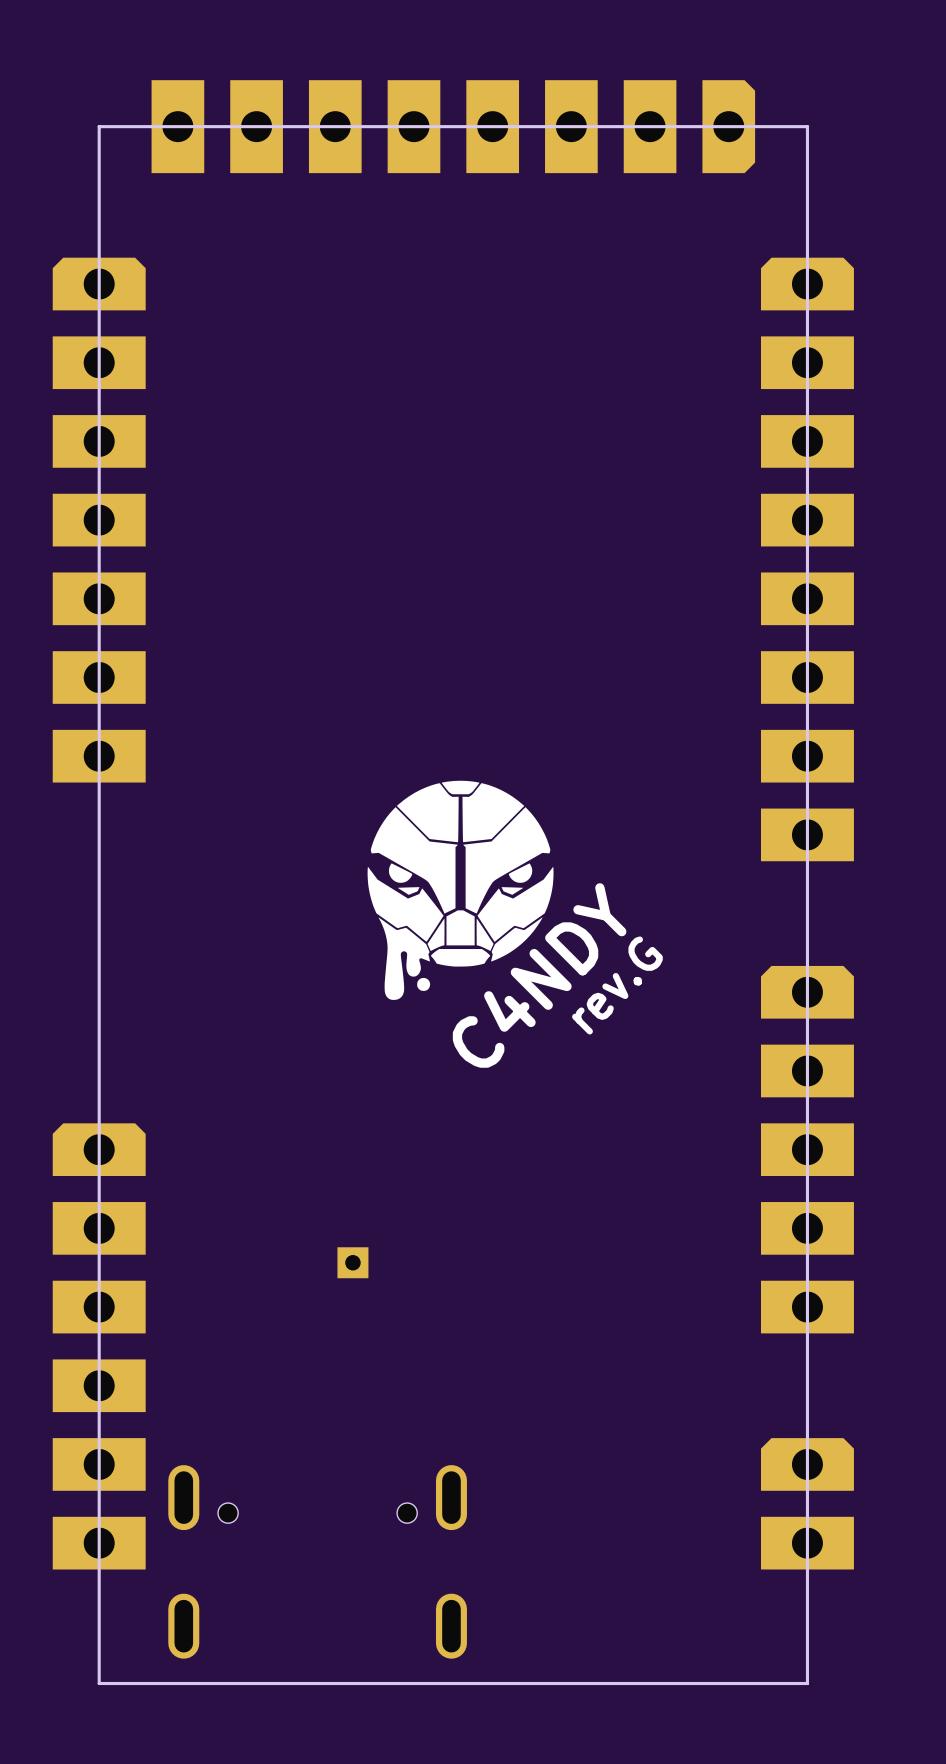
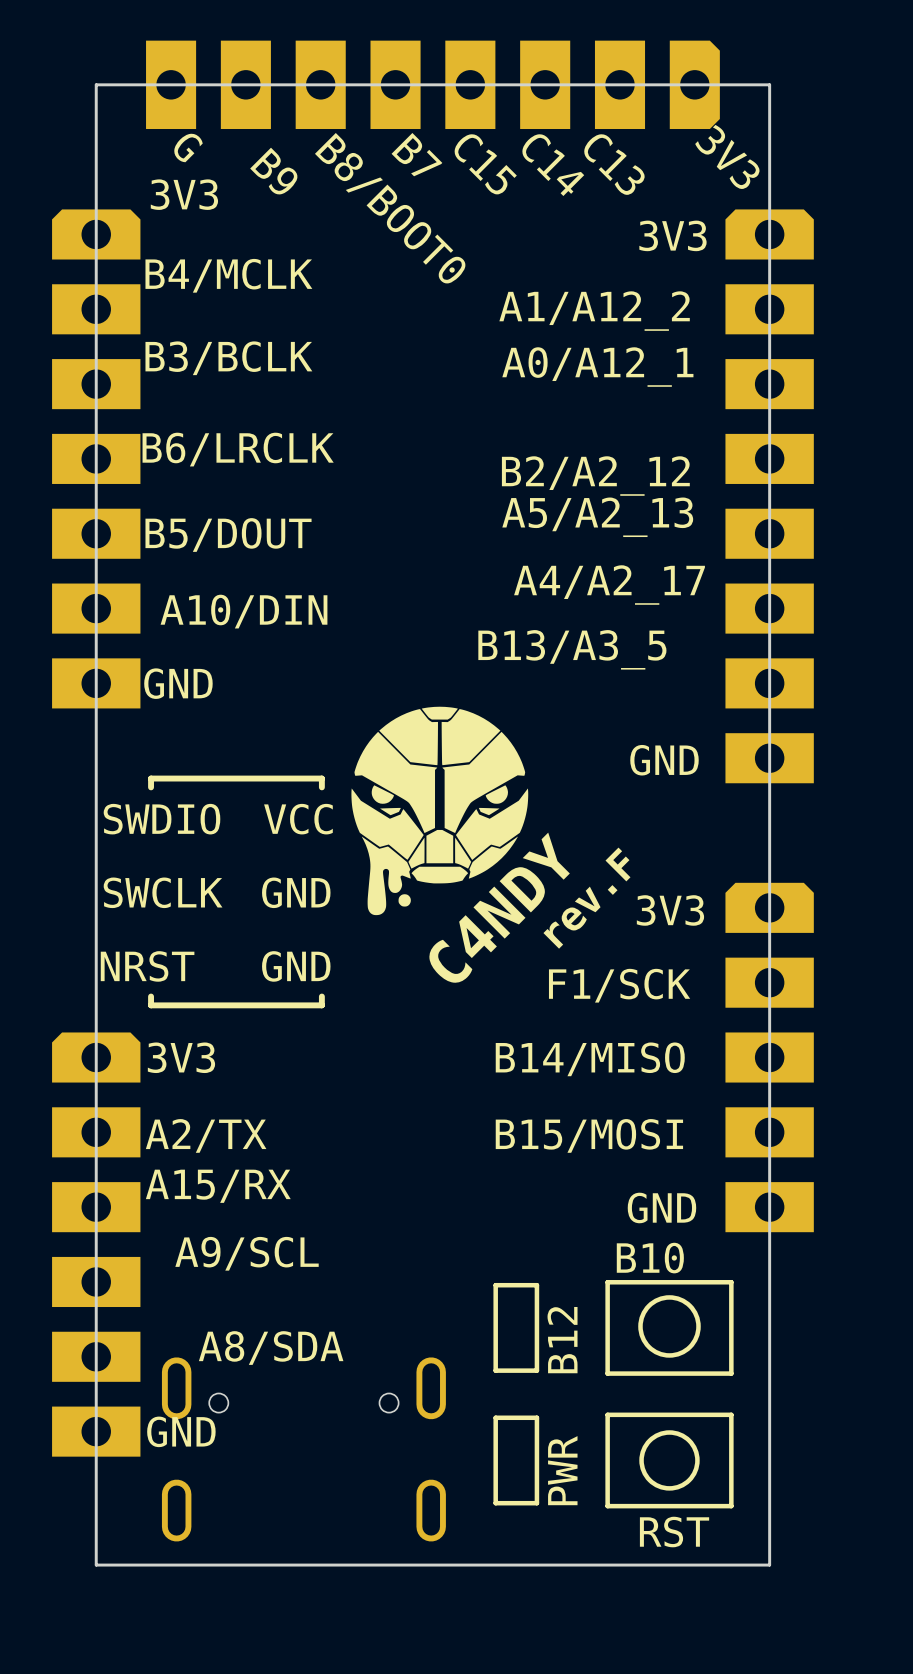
text: none -> G (188, 147)
text: none -> B7 (416, 154)
text: none -> 3V3 (727, 157)
text: none -> C15 (485, 164)
text: none -> C14 (553, 164)
text: none -> C13 (614, 164)
text: none -> B9 (274, 171)
text: none -> 3V3 (184, 194)
text: none -> B8/BOOT0 (390, 208)
text: none -> 3V3 (672, 235)
text: none -> B4/MCLK (228, 275)
text: none -> A1/A12_2 (594, 311)
text: none -> B3/BCLK (228, 358)
text: none -> A0/A12_1 (597, 367)
text: none -> B6/LRCLK (238, 449)
text: none -> B2/A2_12 (595, 476)
text: none -> A5/A2_13 (597, 517)
text: none -> B5/DOUT (228, 535)
text: none -> A4/A2_17 (609, 585)
text: none -> A10/DIN (244, 611)
text: none -> B13/A3_5 (572, 649)
text: none -> GND (178, 683)
text: none -> GND (664, 760)
line: none -> (321, 787) (321, 778) (151, 778) (151, 787)
text: none -> SWDIO (161, 819)
text: none -> VCC (298, 819)
text: none -> SWCLK (163, 892)
text: none -> GND (296, 892)
text: rev.G (617, 985) -> rev.F (586, 898)
text: none -> 3V3 (670, 910)
text: none -> NRST (147, 966)
text: none -> GND (296, 966)
text: none -> F1/SCK (619, 985)
line: none -> (321, 996) (321, 1005) (151, 1005) (151, 996)
text: none -> 3V3 (181, 1057)
text: none -> B14/MISO (590, 1059)
text: none -> A2/TX (206, 1135)
text: none -> B15/MOSI (589, 1135)
part: (352, 1262) -> none
text: none -> A15/RX (218, 1186)
text: none -> GND (661, 1207)
text: none -> A9/SCL (247, 1253)
text: none -> B10 (650, 1258)
line: none -> (731, 1282) (607, 1282) (607, 1373) (731, 1373) (731, 1282)
line: none -> (536, 1285) (536, 1370) (495, 1370) (495, 1285) (536, 1285)
drawing: none -> [638, 1295, 701, 1358]
text: none -> B12 (562, 1340)
text: none -> A8/SDA (271, 1348)
part: (807, 1503) -> none
line: none -> (731, 1414) (731, 1506) (607, 1506) (607, 1414) (731, 1414)
line: none -> (536, 1417) (495, 1417) (495, 1503) (536, 1503) (536, 1417)
drawing: none -> [639, 1430, 700, 1491]
text: none -> GND (181, 1431)
text: none -> PWR (562, 1470)
text: none -> RST (674, 1532)

